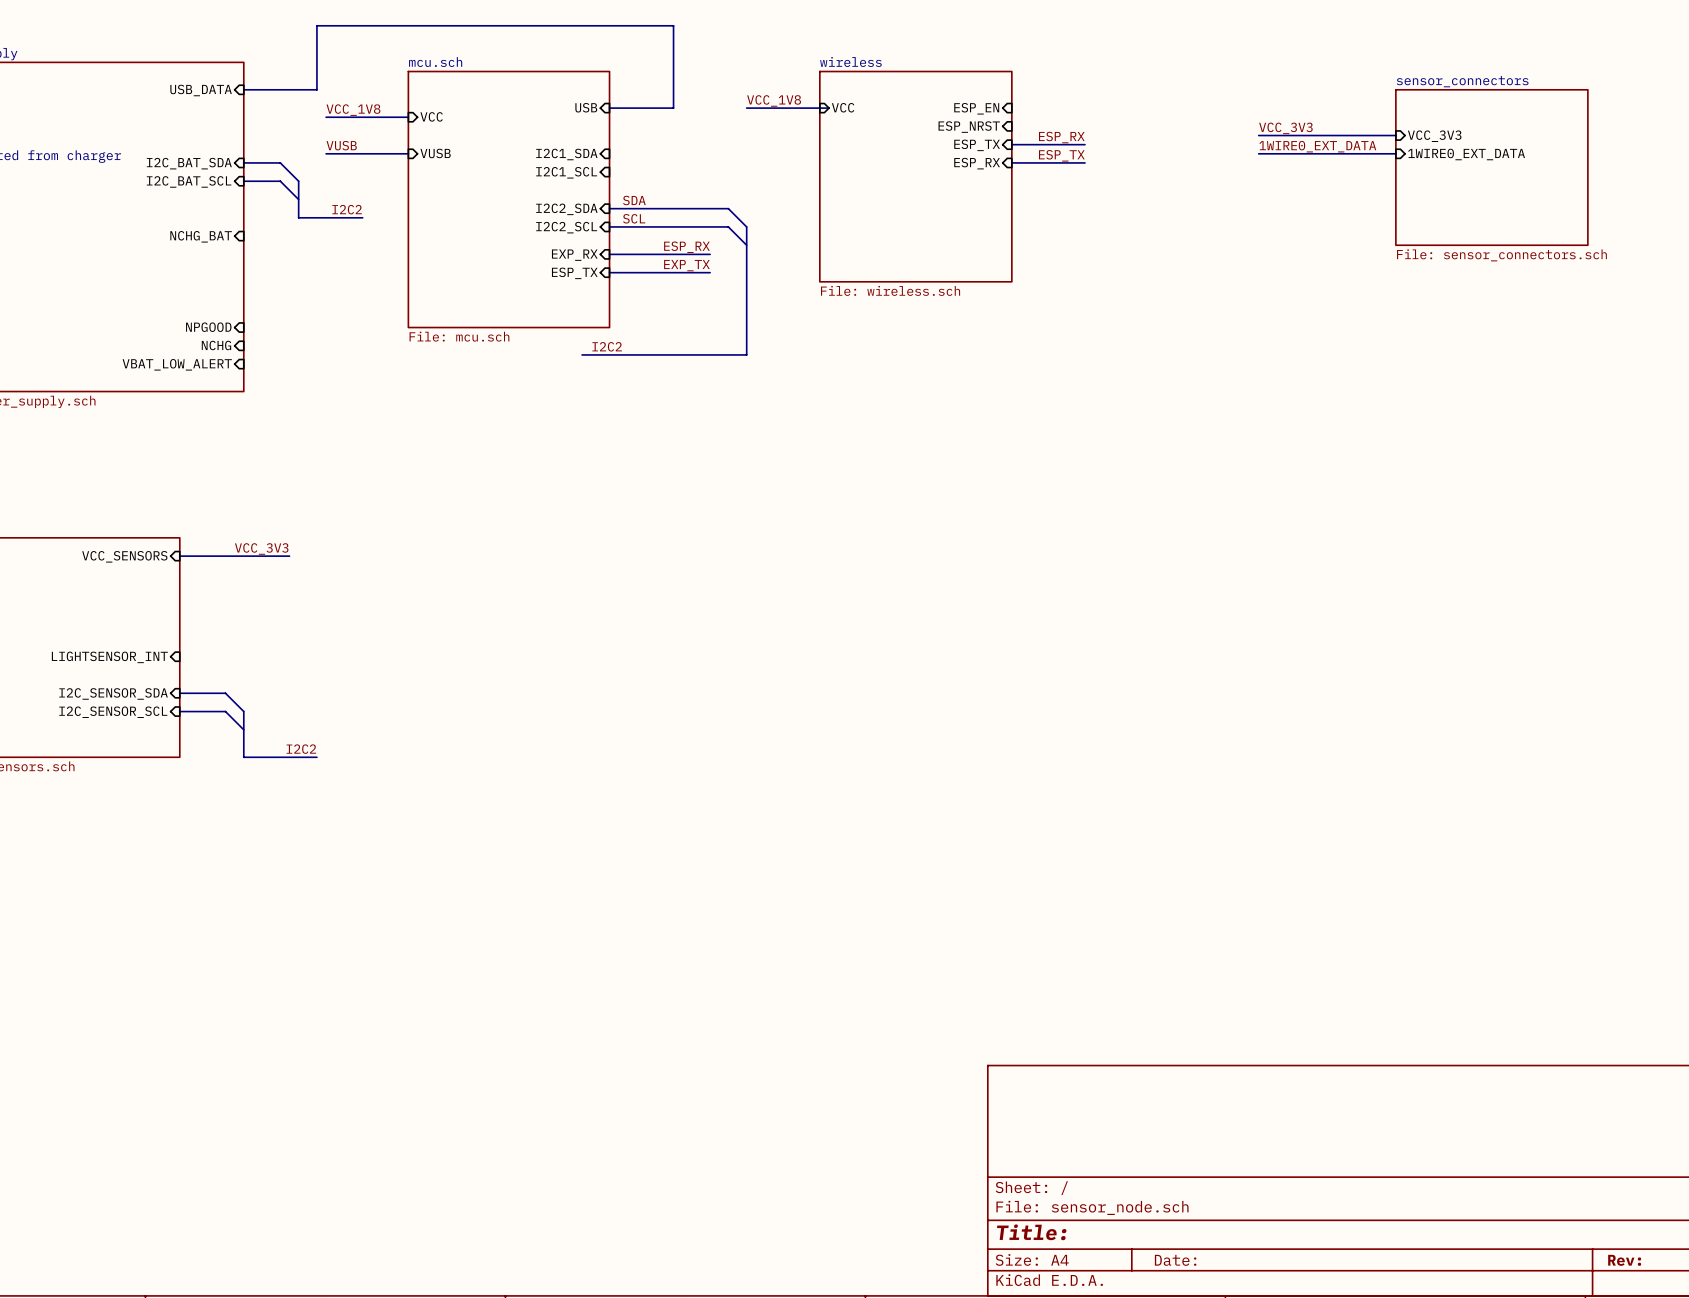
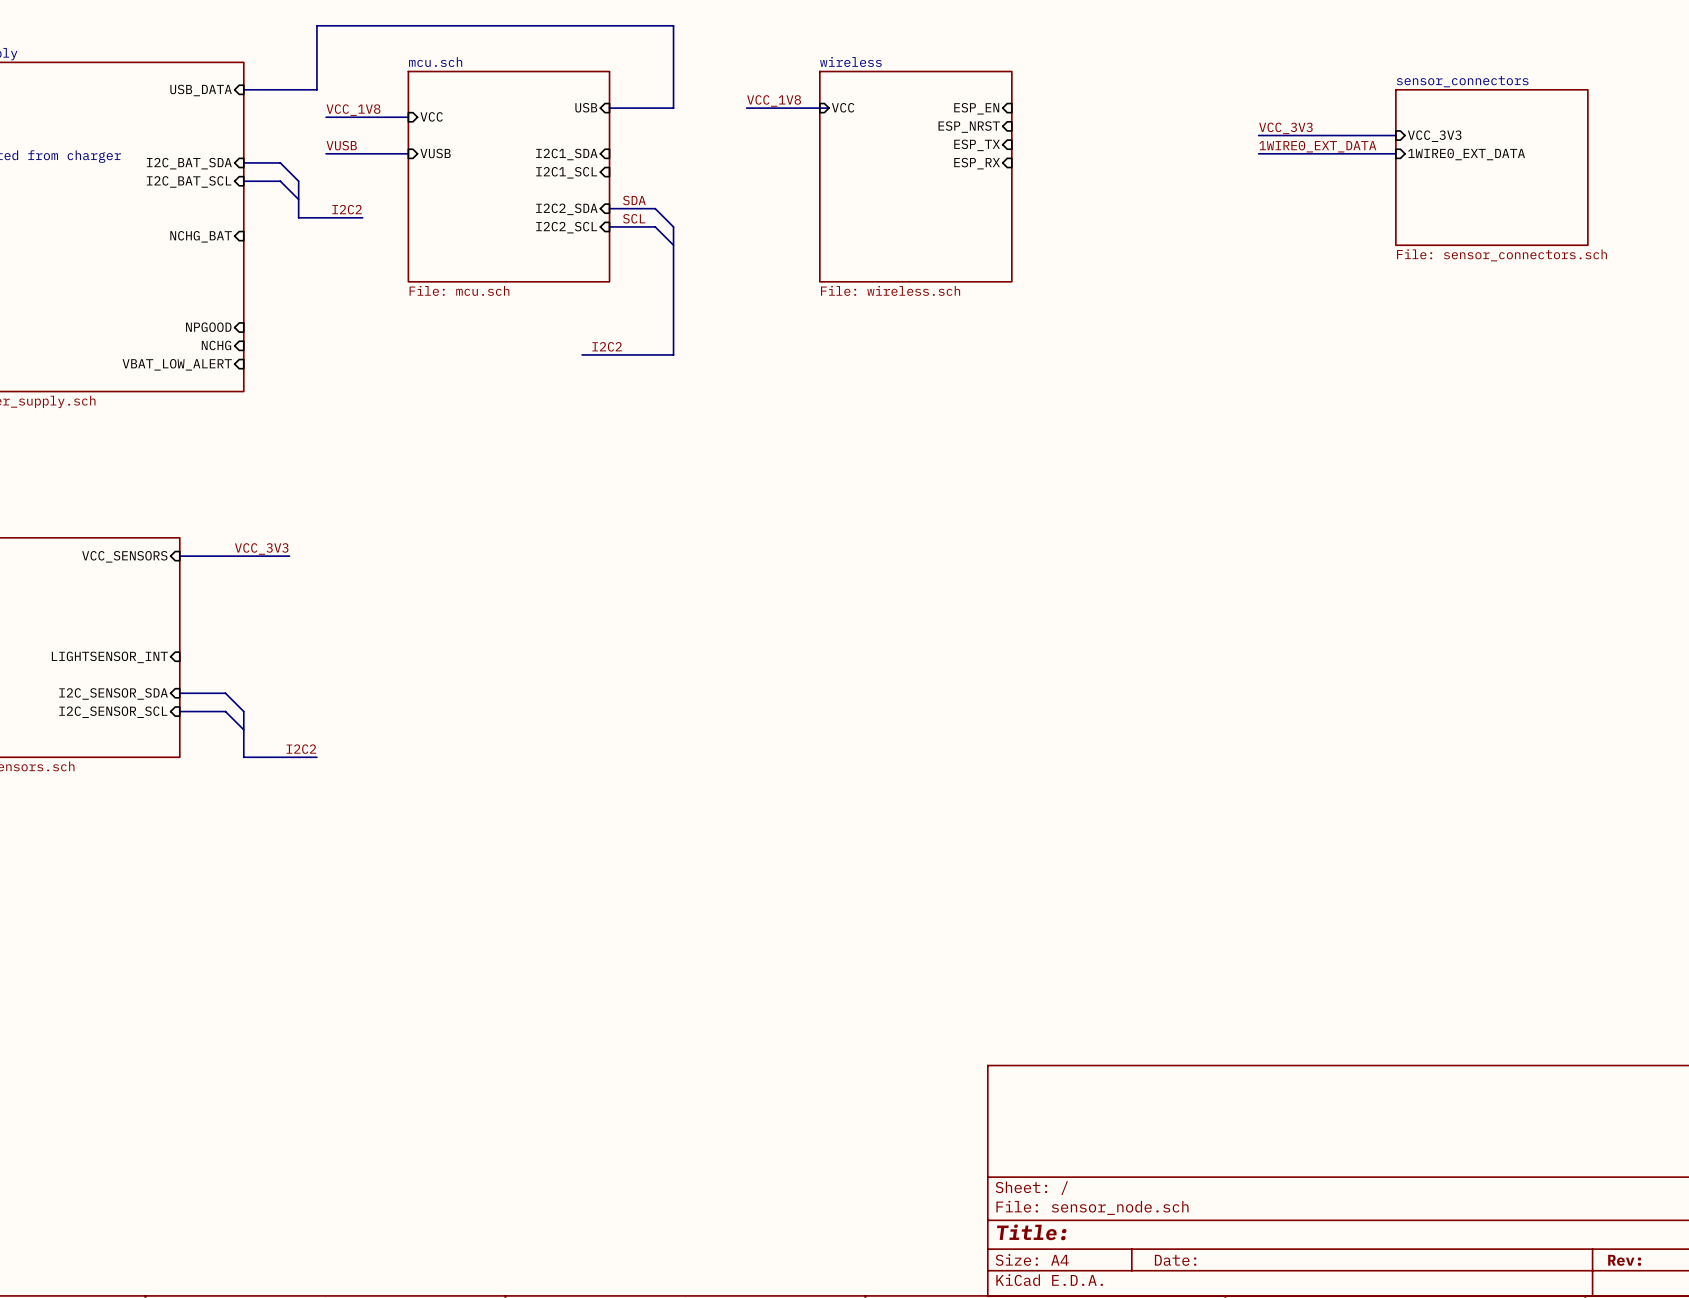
label: ESP_RX (1061, 137) -> none
wire: (1011, 144) (1084, 144) -> none
label: ESP_TX (1061, 155) -> none
wire: (1011, 162) (1084, 162) -> none
sheet mcu.sch: none -> File: mcu.sch (508, 176)
sheet mcu.sch: File: mcu.sch (508, 199) -> none
wire: (655, 208) (728, 208) (746, 226) -> (655, 208) (673, 226)
wire: (655, 226) (728, 226) (746, 245) -> (655, 226) (673, 245)
bus: (746, 226) (746, 354) (673, 354) -> (673, 226) (673, 354)
label: ESP_RX (686, 247) -> none
wire: (609, 254) (710, 254) -> none
sheet pin: EXP_RX (574, 255) -> none
label: EXP_TX (686, 265) -> none
wire: (609, 272) (710, 272) -> none
sheet pin: ESP_TX (574, 273) -> none

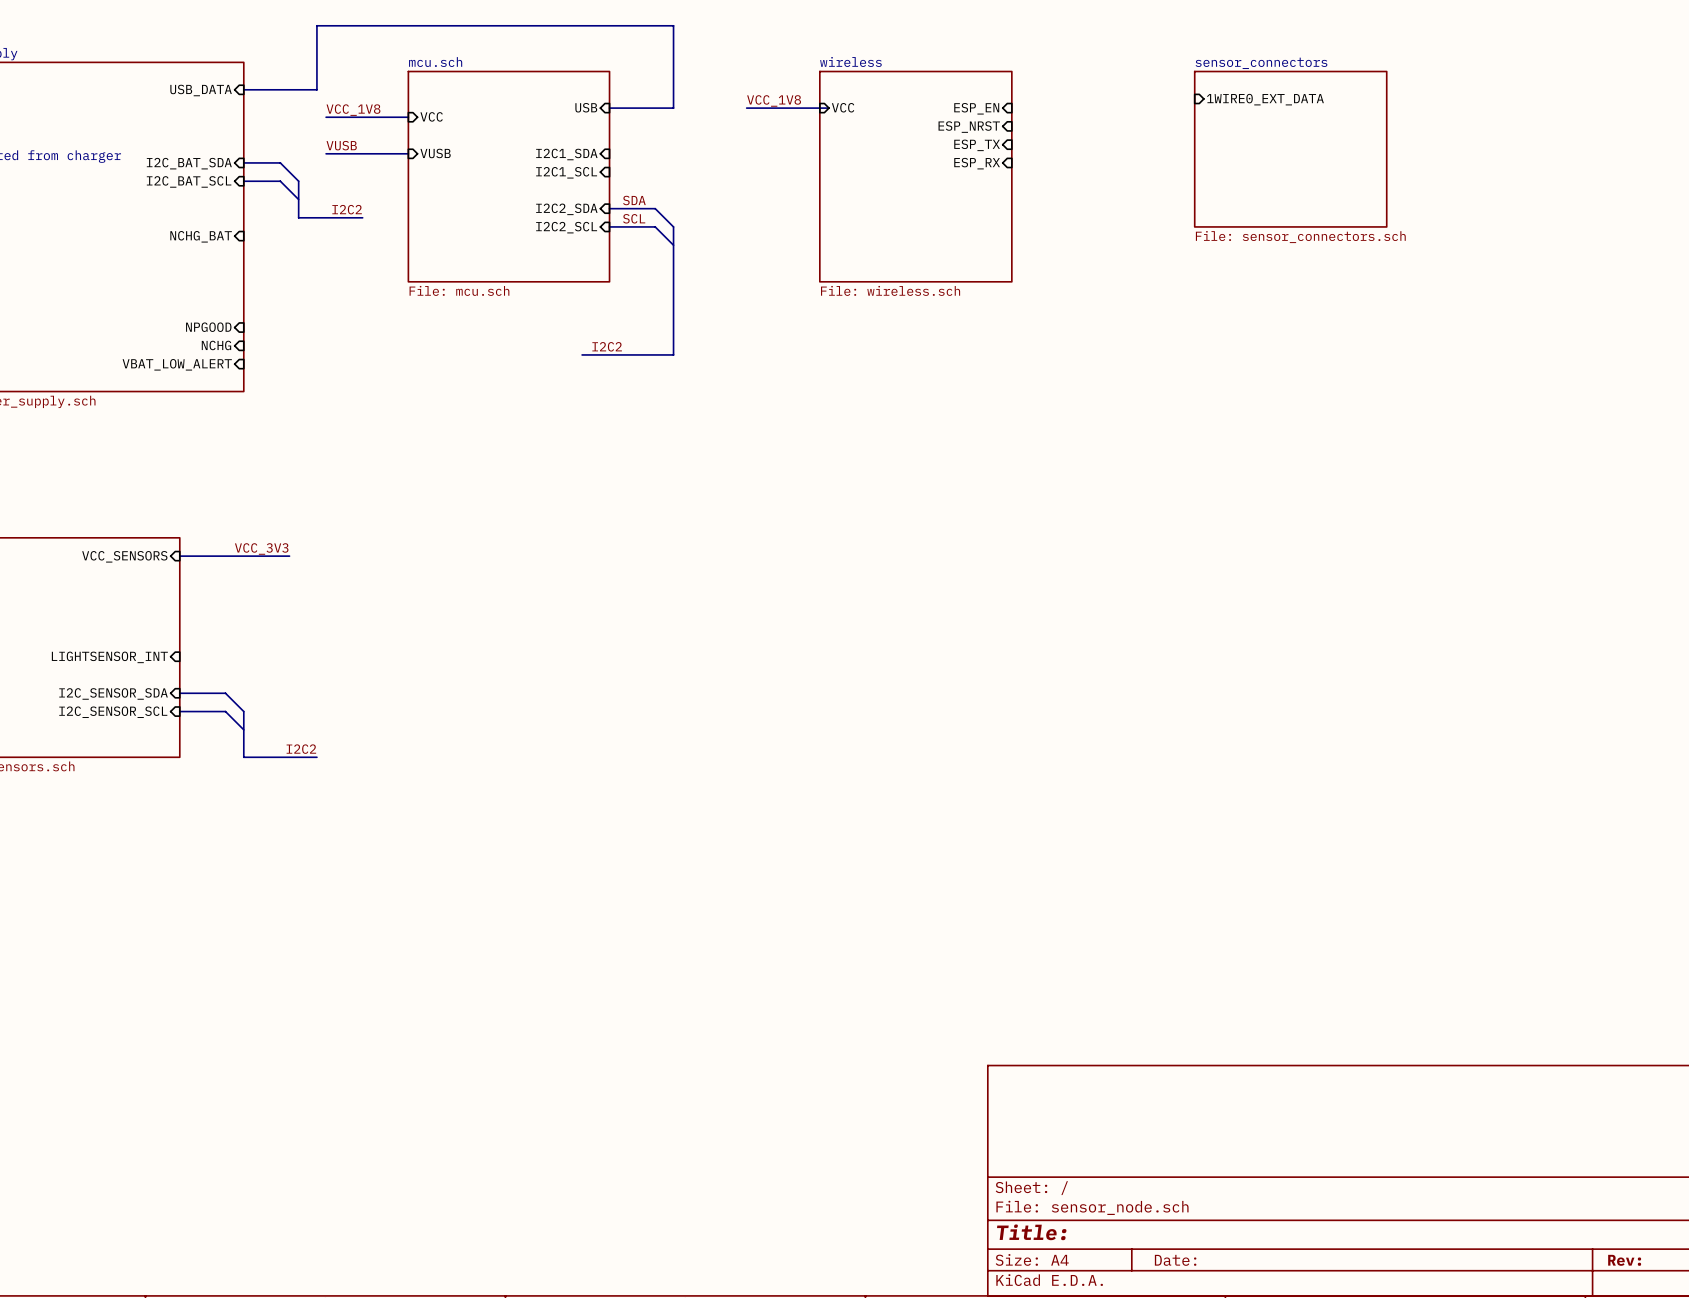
sheet pin: none -> 1WIRE0_EXT_DATA (1265, 99)
label: VCC_3V3 (1285, 128) -> none
wire: (1258, 135) (1395, 135) -> none
sheet pin: VCC_3V3 (1434, 136) -> none
label: 1WIRE0_EXT_DATA (1317, 146) -> none
sheet sensor_connectors: none -> File: sensor_connectors.sch (1290, 149)
wire: (1258, 153) (1395, 153) -> none
sheet pin: 1WIRE0_EXT_DATA (1466, 154) -> none
sheet sensor_connectors: File: sensor_connectors.sch (1491, 167) -> none

